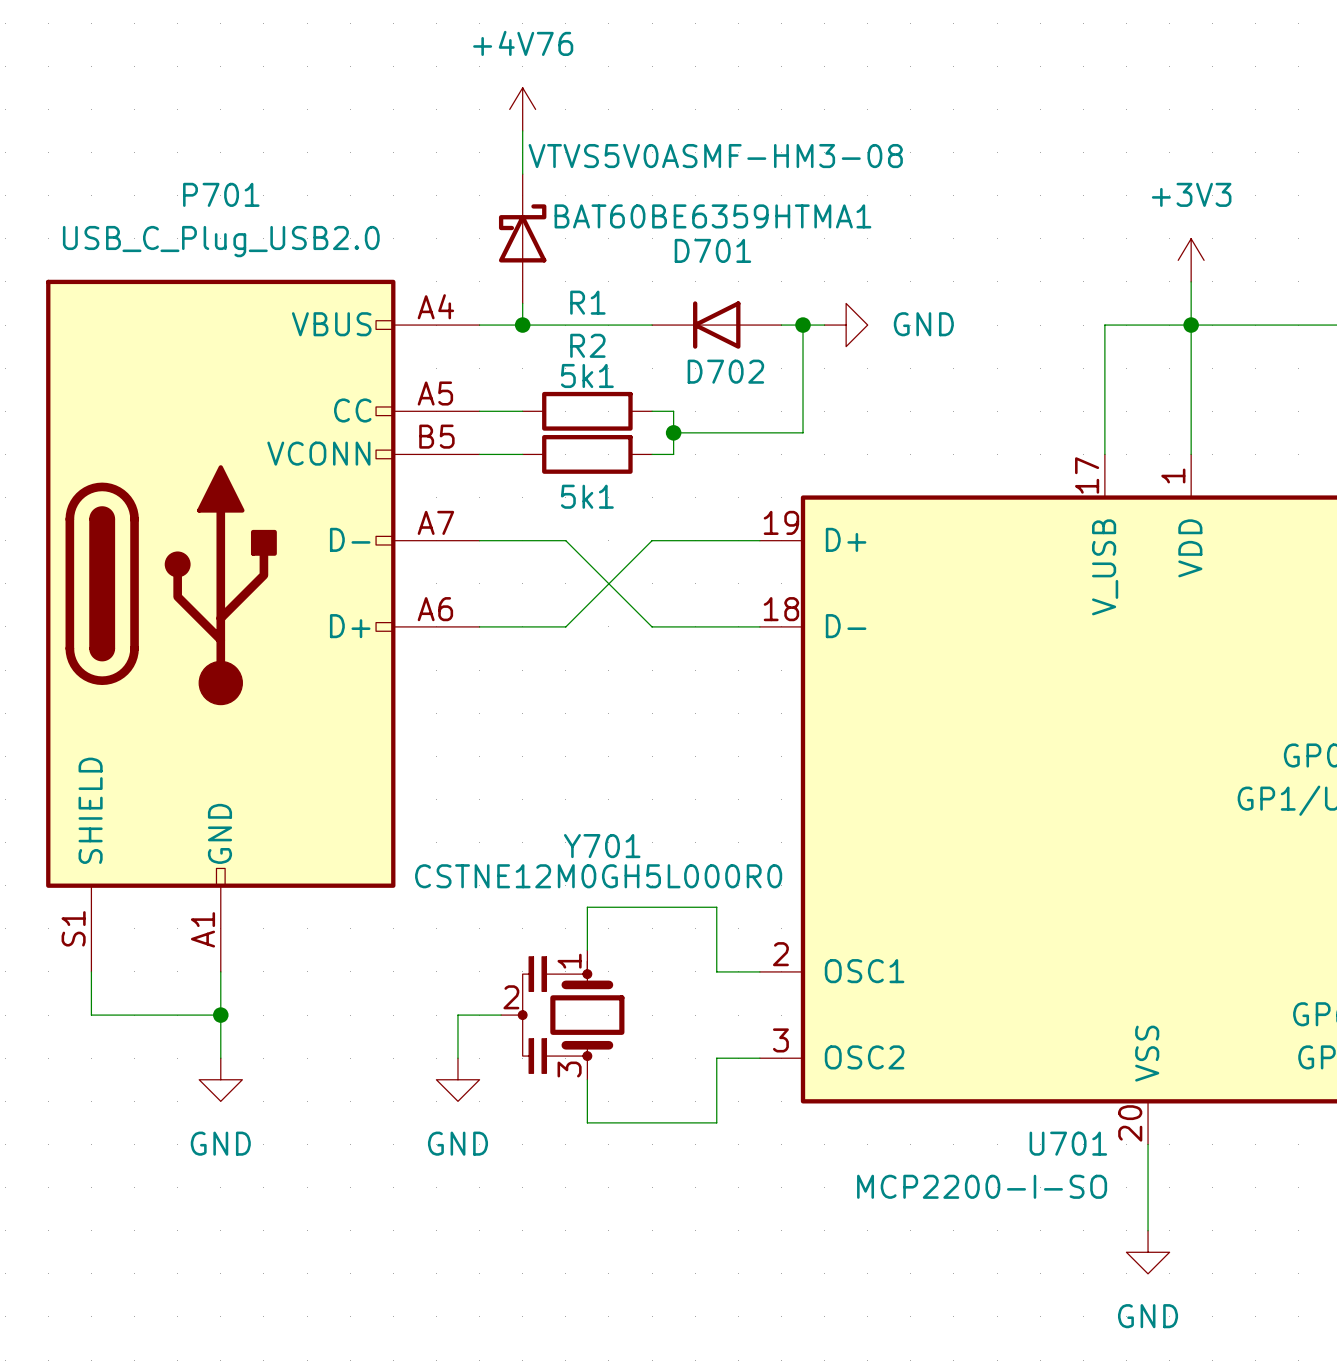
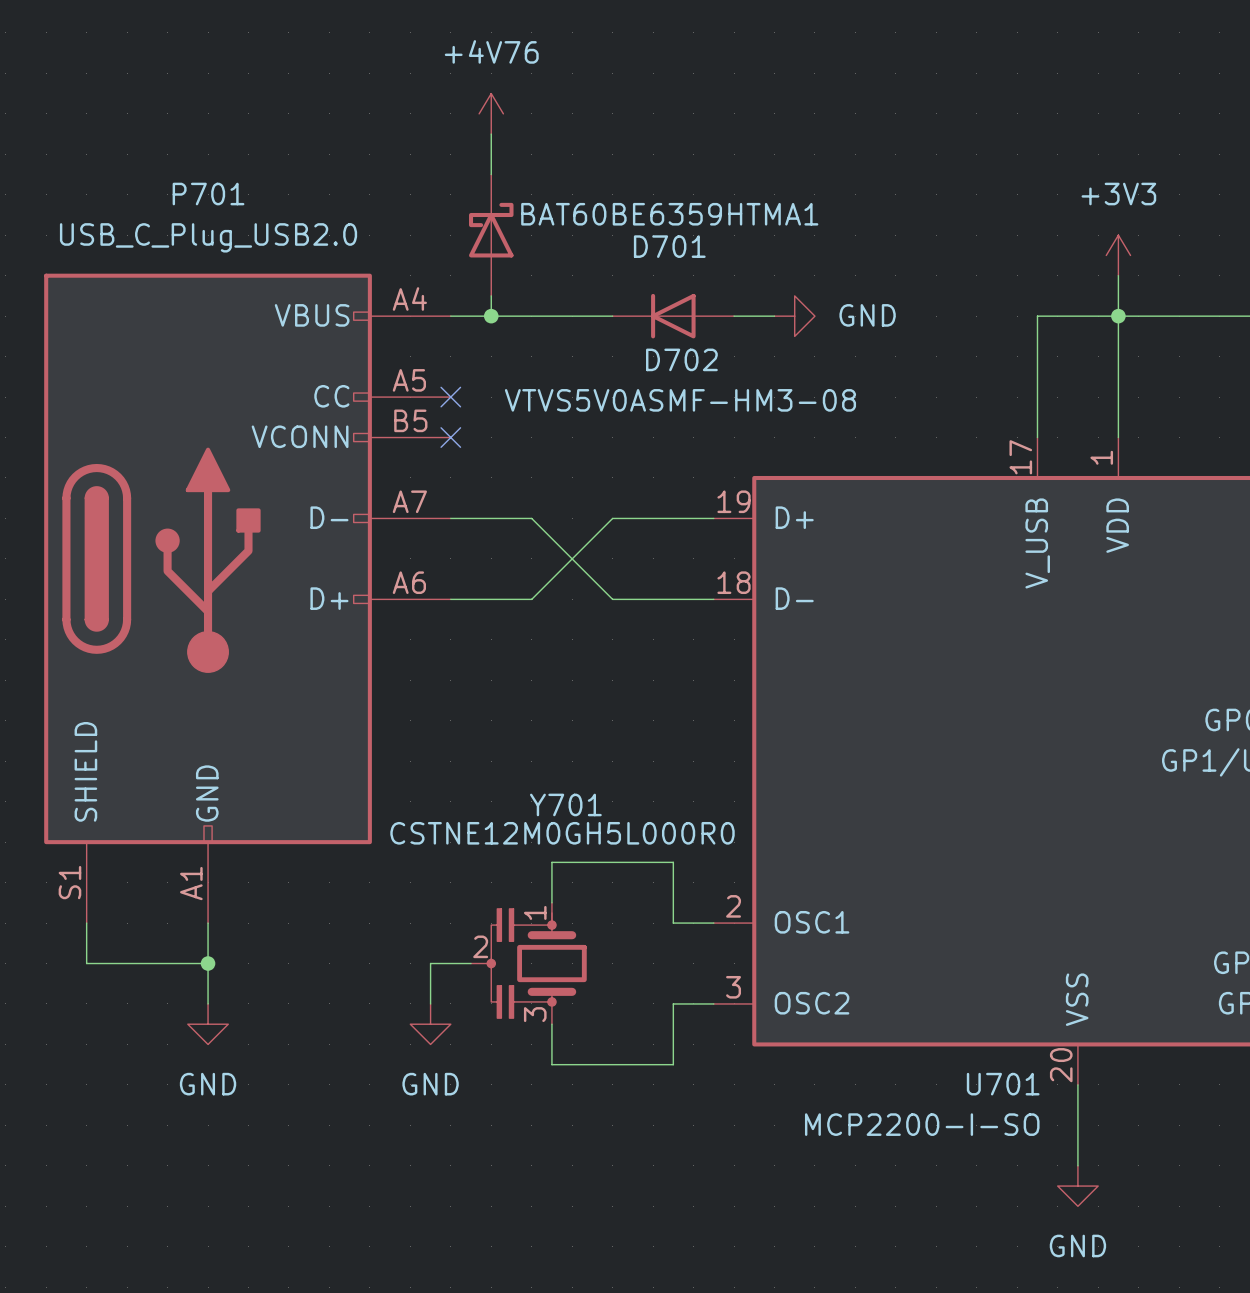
D702 value position: VTVS5V0ASMF-HM3-08 (715, 156) -> VTVS5V0ASMF-HM3-08 (680, 400)
wire: (803, 325) (803, 432) (673, 432) -> none
junction: (803, 325) -> none
wire: (479, 411) (522, 411) -> none
no-connect mark: none -> (450, 397)
R1: 5k1 (587, 411) -> none
wire: (652, 411) (673, 411) (673, 454) (652, 454) -> none
junction: (673, 432) -> none
wire: (479, 454) (522, 454) -> none
no-connect mark: none -> (450, 437)
R2: 5k1 (587, 454) -> none

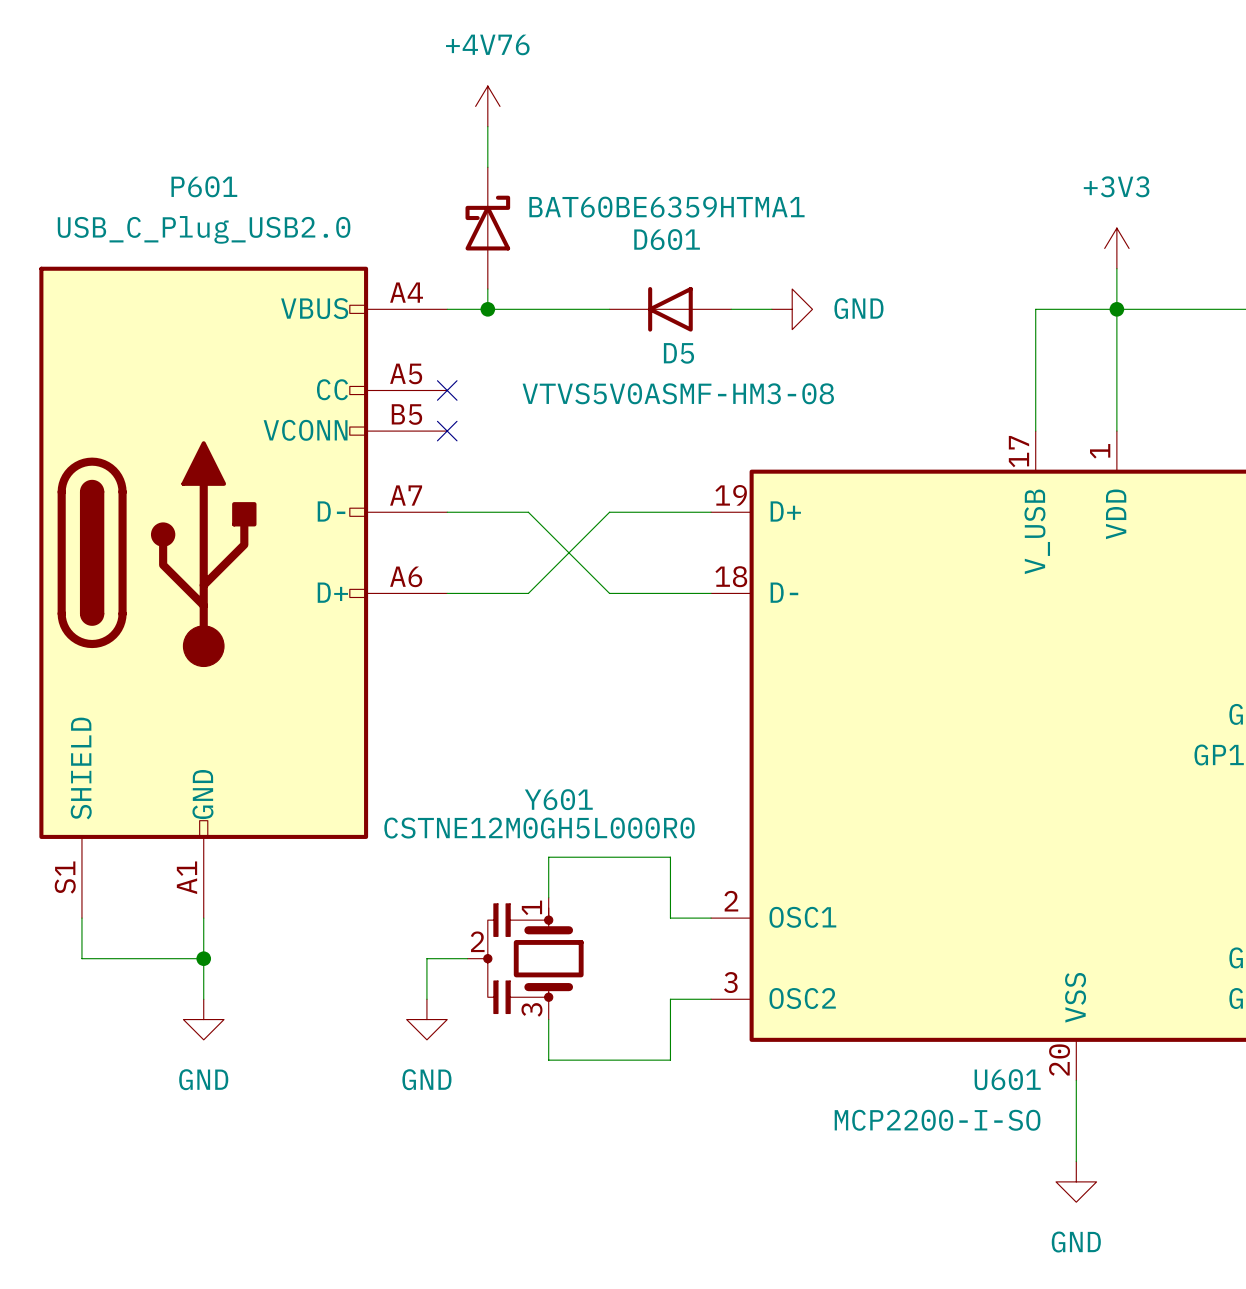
P701 name: P701 (208, 194) -> P601 (204, 186)
D701 name: D701 (669, 246) -> D601 (667, 239)
D702 name: D702 (681, 359) -> D5 (678, 353)
Y701 name: Y701 (565, 804) -> Y601 (558, 799)
U701 name: U701 (1003, 1084) -> U601 (1007, 1079)

